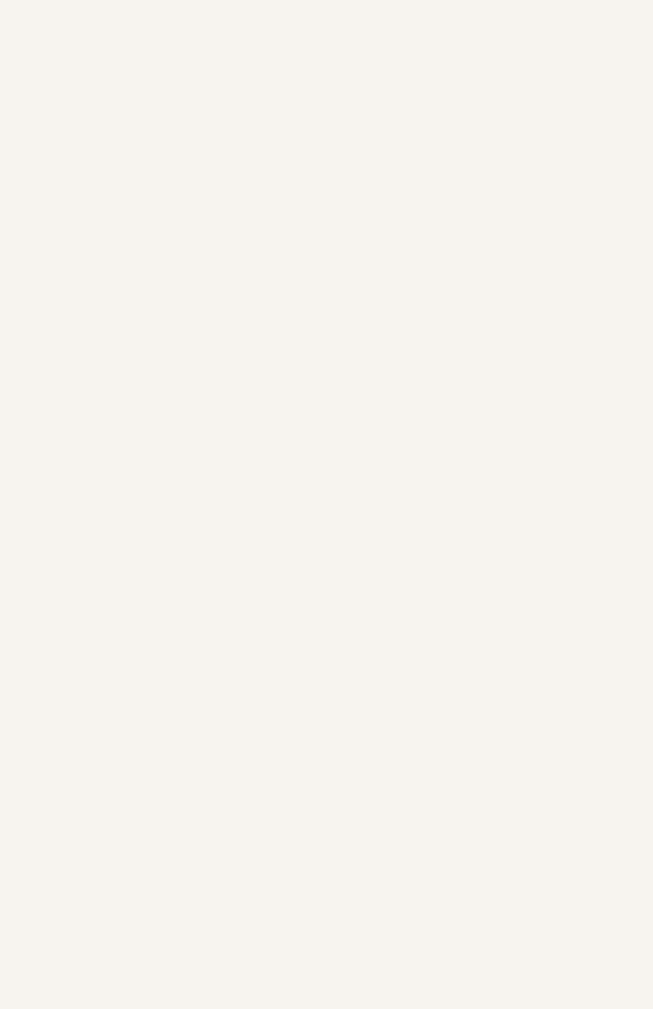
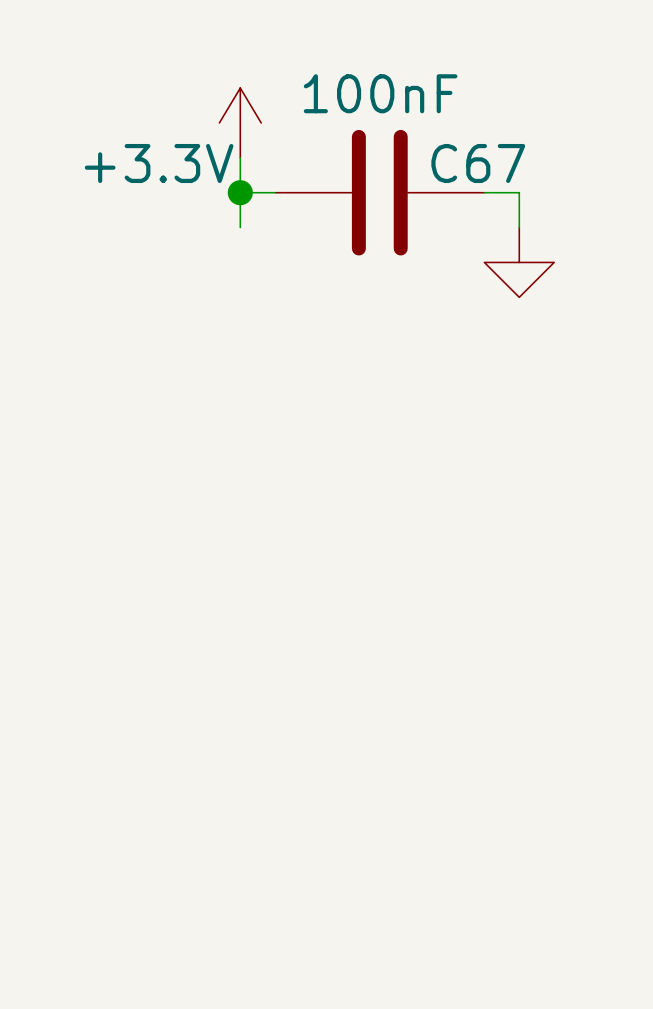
power symbol: none -> +3.3V (240, 122)
wire: none -> (240, 157) (240, 227)
wire: none -> (240, 192) (275, 192)
junction: none -> (240, 192)
C67: none -> 100nF (379, 192)
wire: none -> (484, 192) (519, 192) (519, 227)
power symbol: none -> (519, 262)

